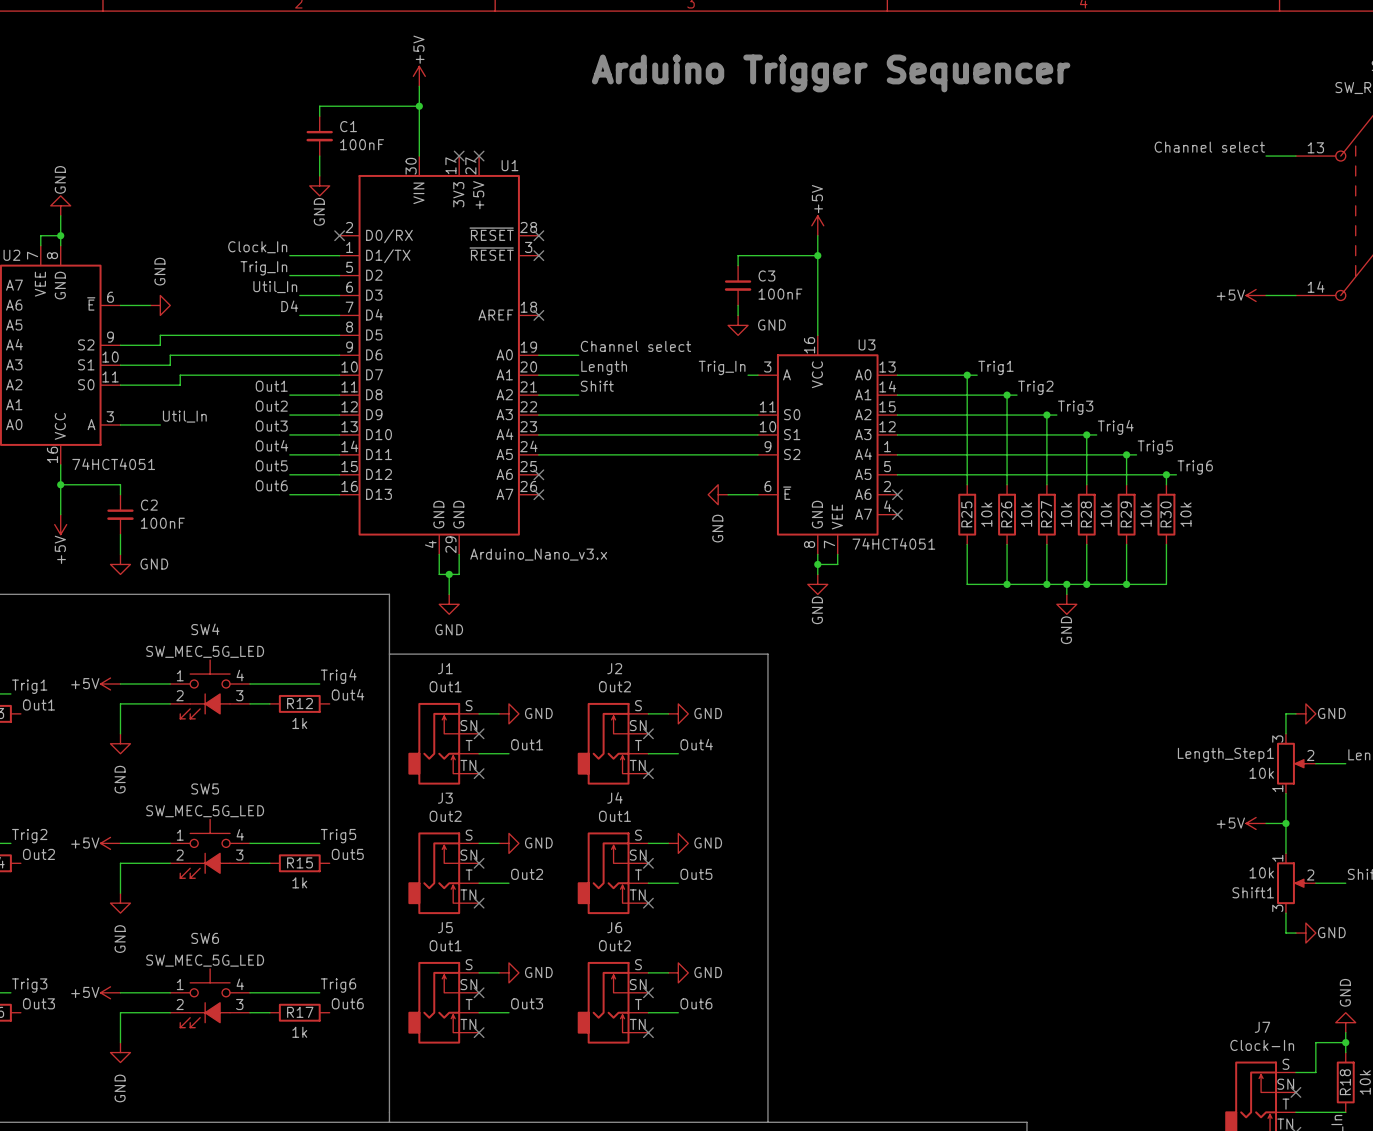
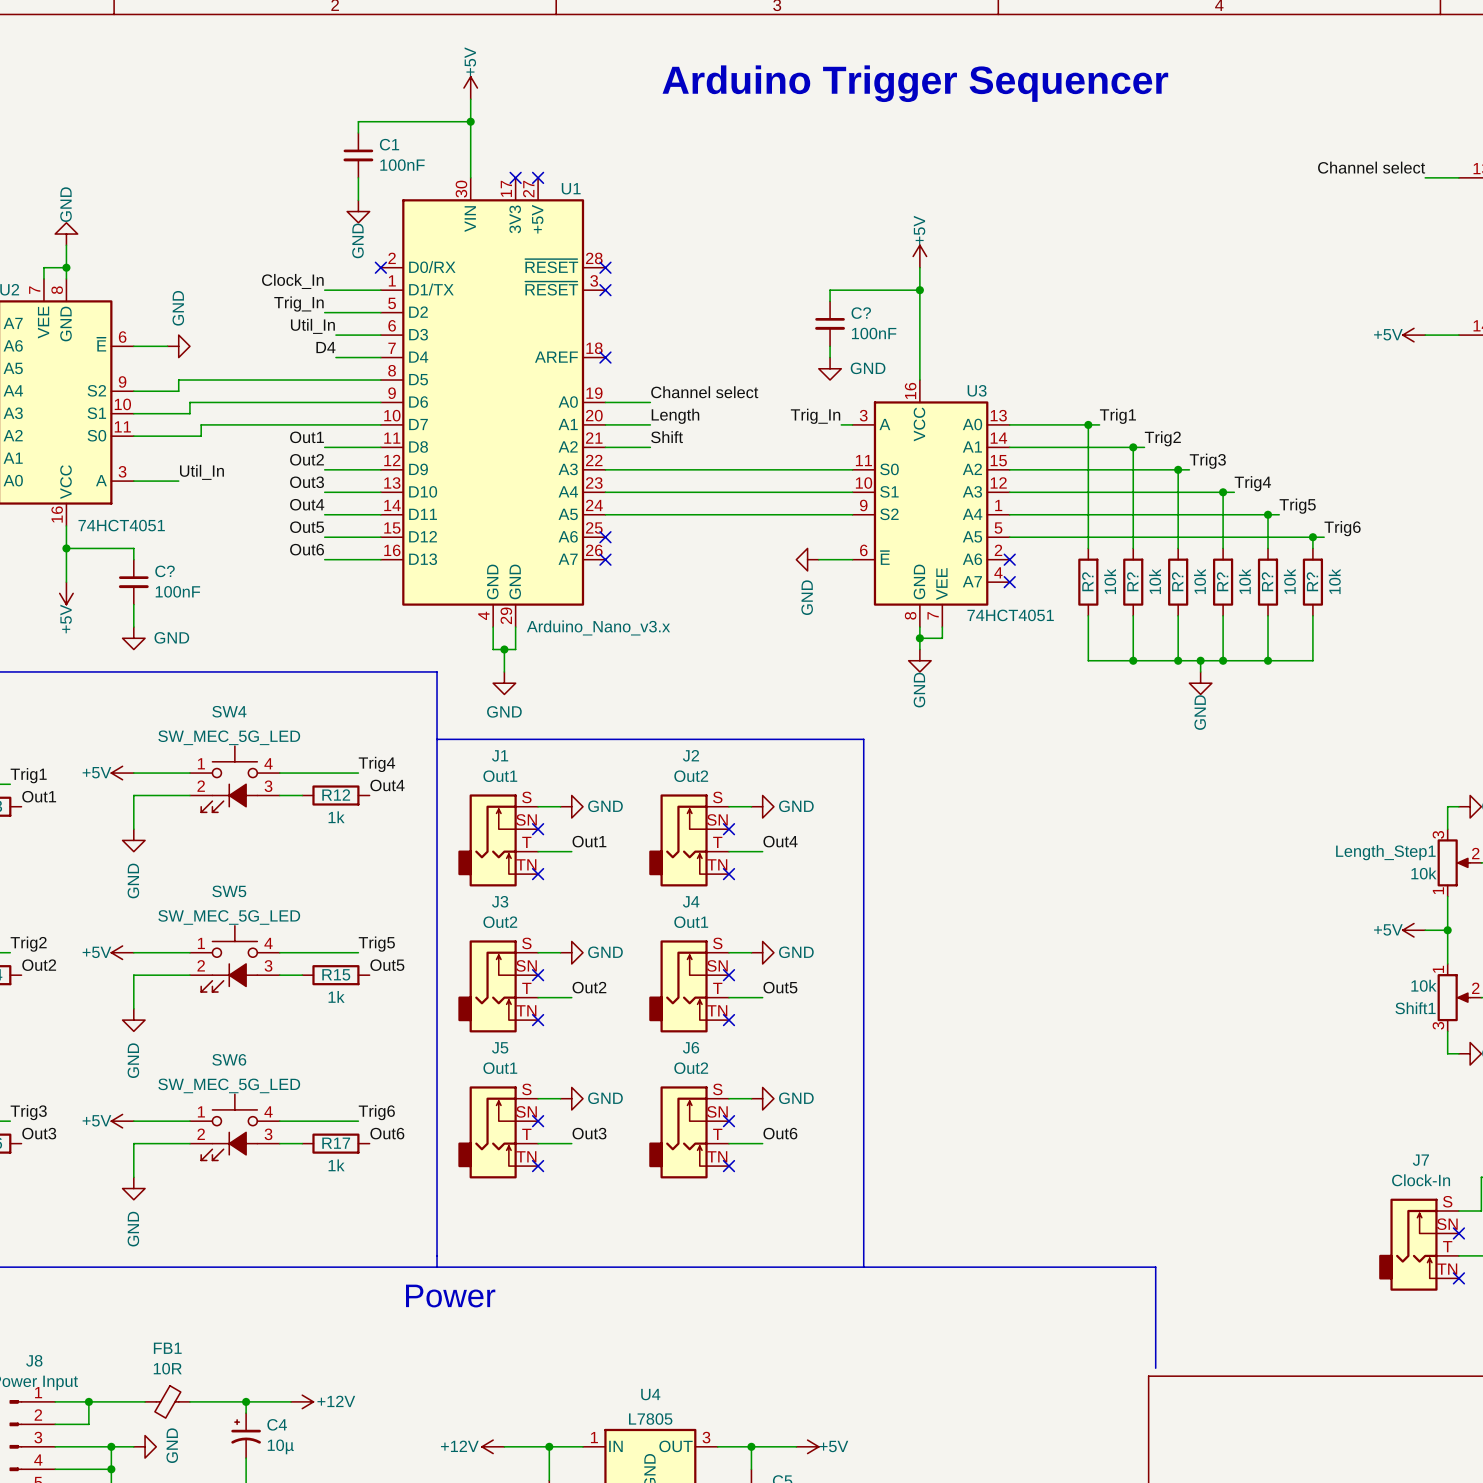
C3 name: C3 (766, 276) -> C? (861, 313)
C2 name: C2 (149, 505) -> C? (165, 571)
R25 name: R25 (966, 514) -> R? (1087, 581)
R26 name: R26 (1006, 514) -> R? (1132, 581)
R27 name: R27 (1046, 514) -> R? (1177, 581)
R28 name: R28 (1086, 514) -> R? (1222, 581)
R29 name: R29 (1126, 514) -> R? (1267, 581)
R30 name: R30 (1166, 514) -> R? (1312, 581)

